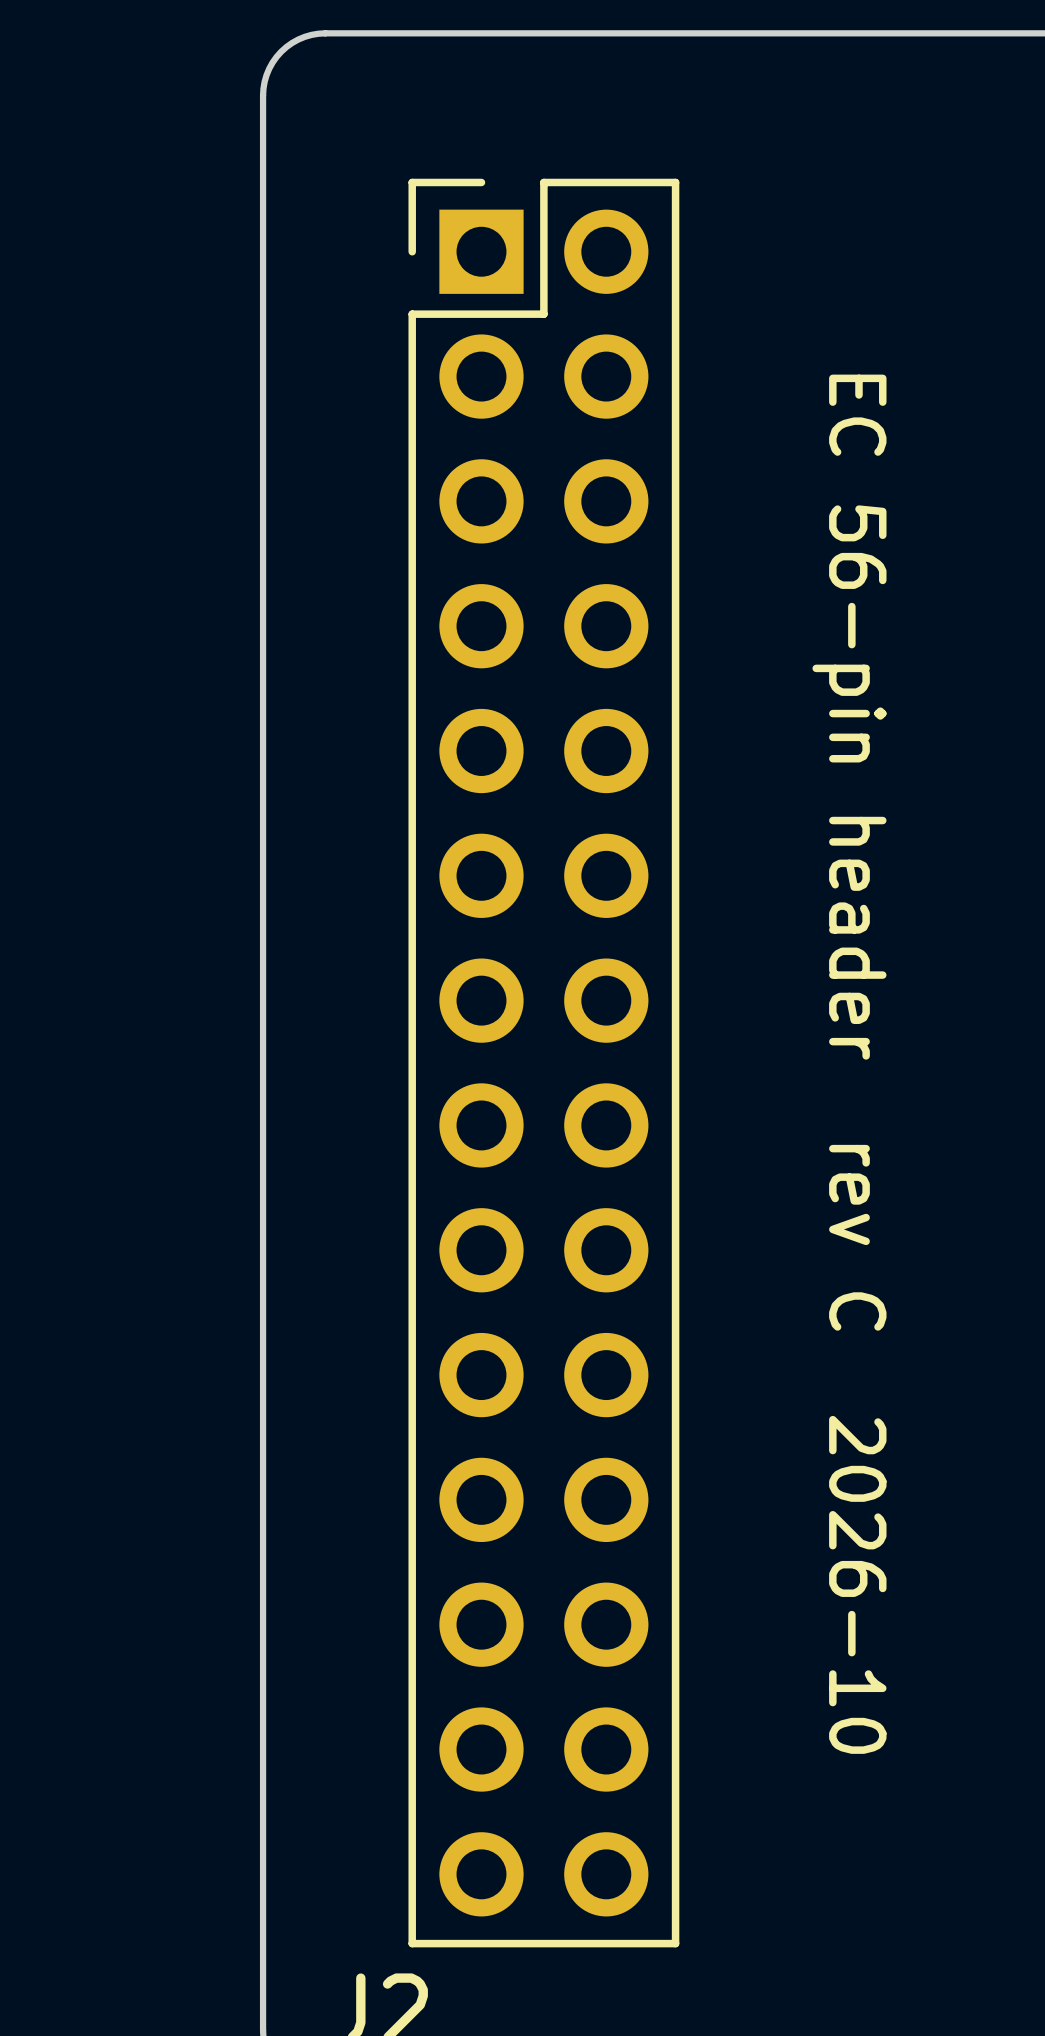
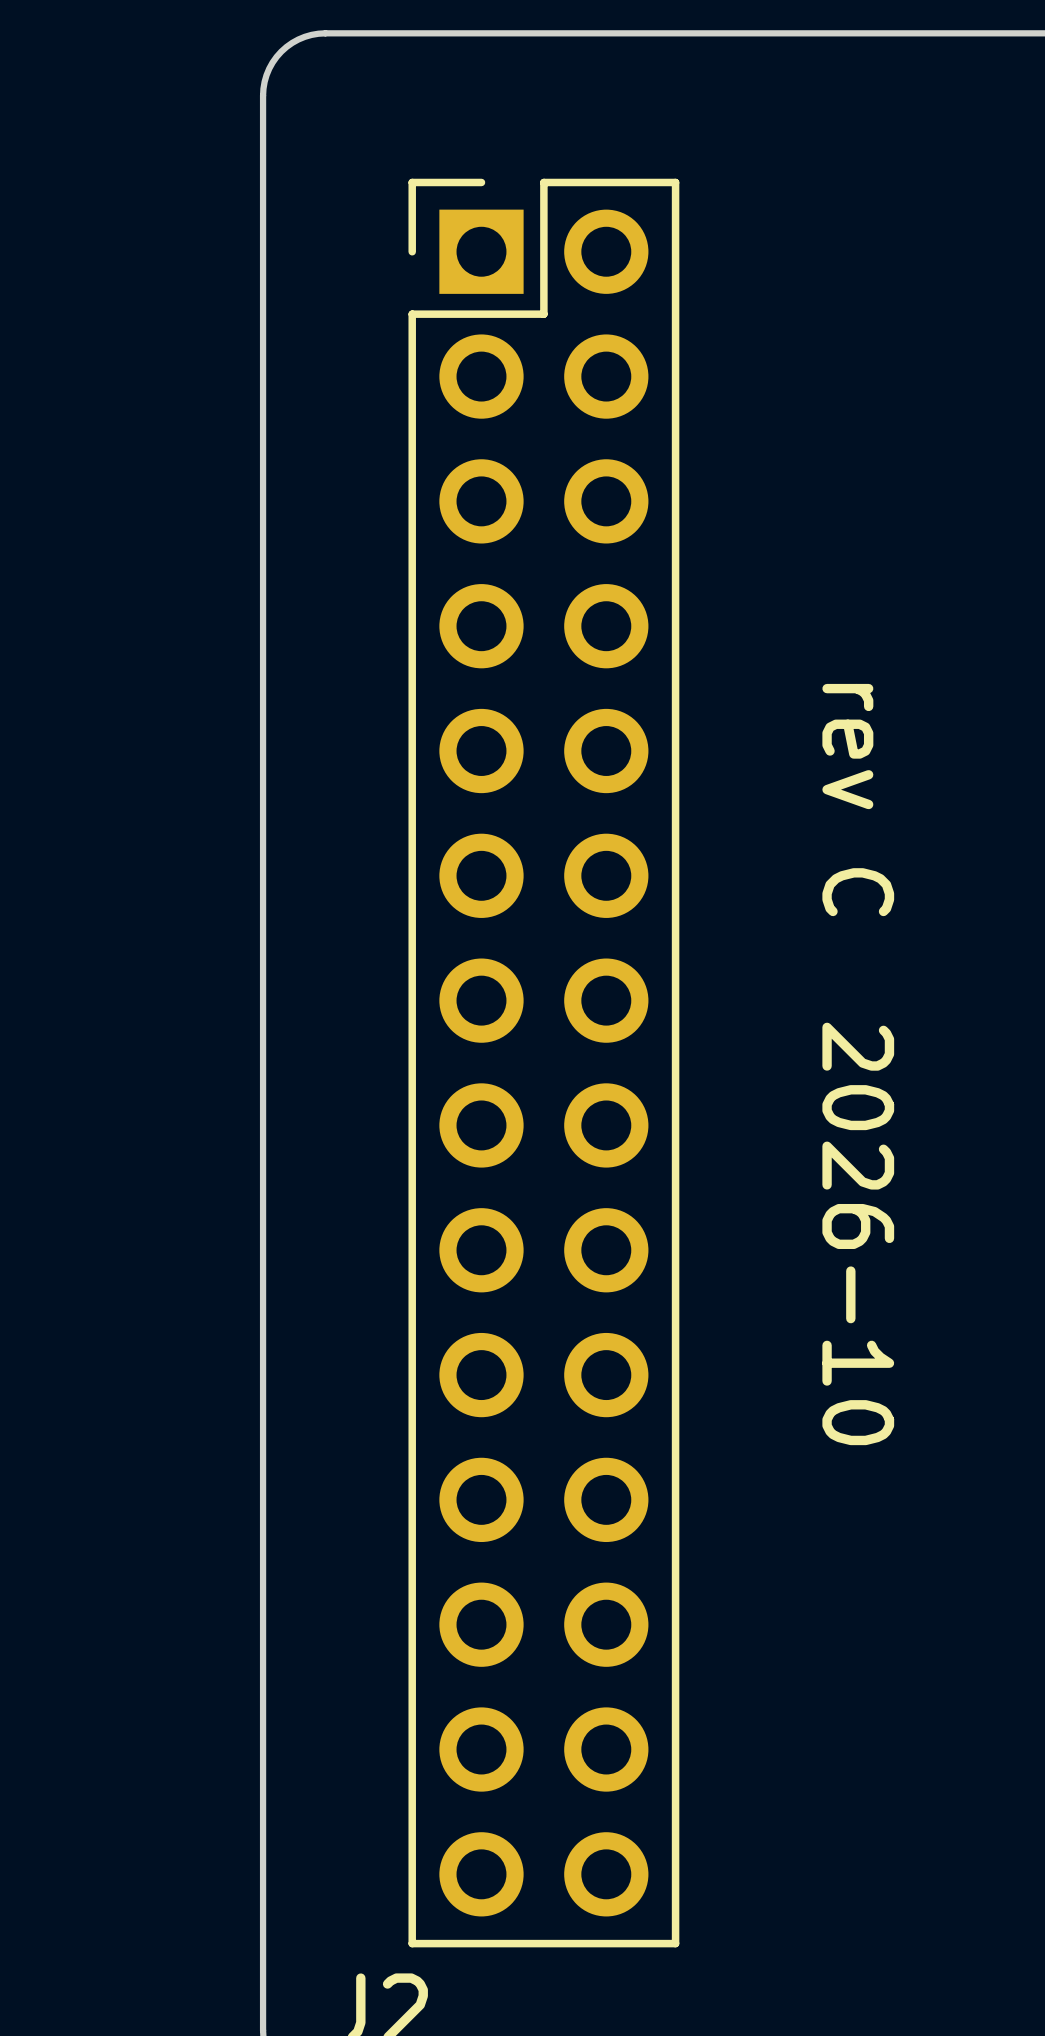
text: EC 56-pin header rev C 2026-10 (849, 1064) -> rev C 2026-10 (858, 1064)

